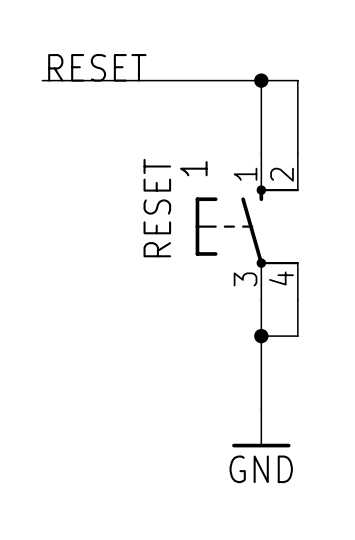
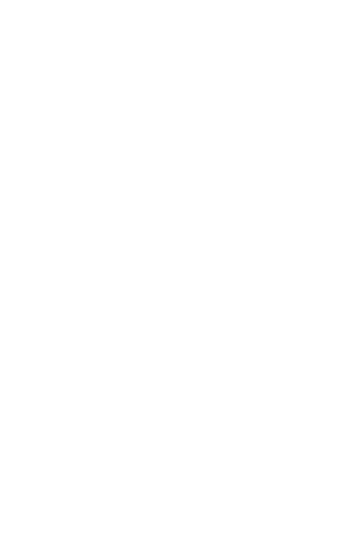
label: RESET (97, 67) -> none
wire: (42, 80) (297, 80) (297, 153) -> none
wire: (261, 80) (261, 153) -> none
junction: (261, 80) -> none
RESET: 1 (247, 226) -> none
wire: (261, 299) (261, 409) -> none
wire: (297, 299) (297, 336) (261, 336) -> none
junction: (261, 336) -> none
power symbol: GND (261, 428) -> none

